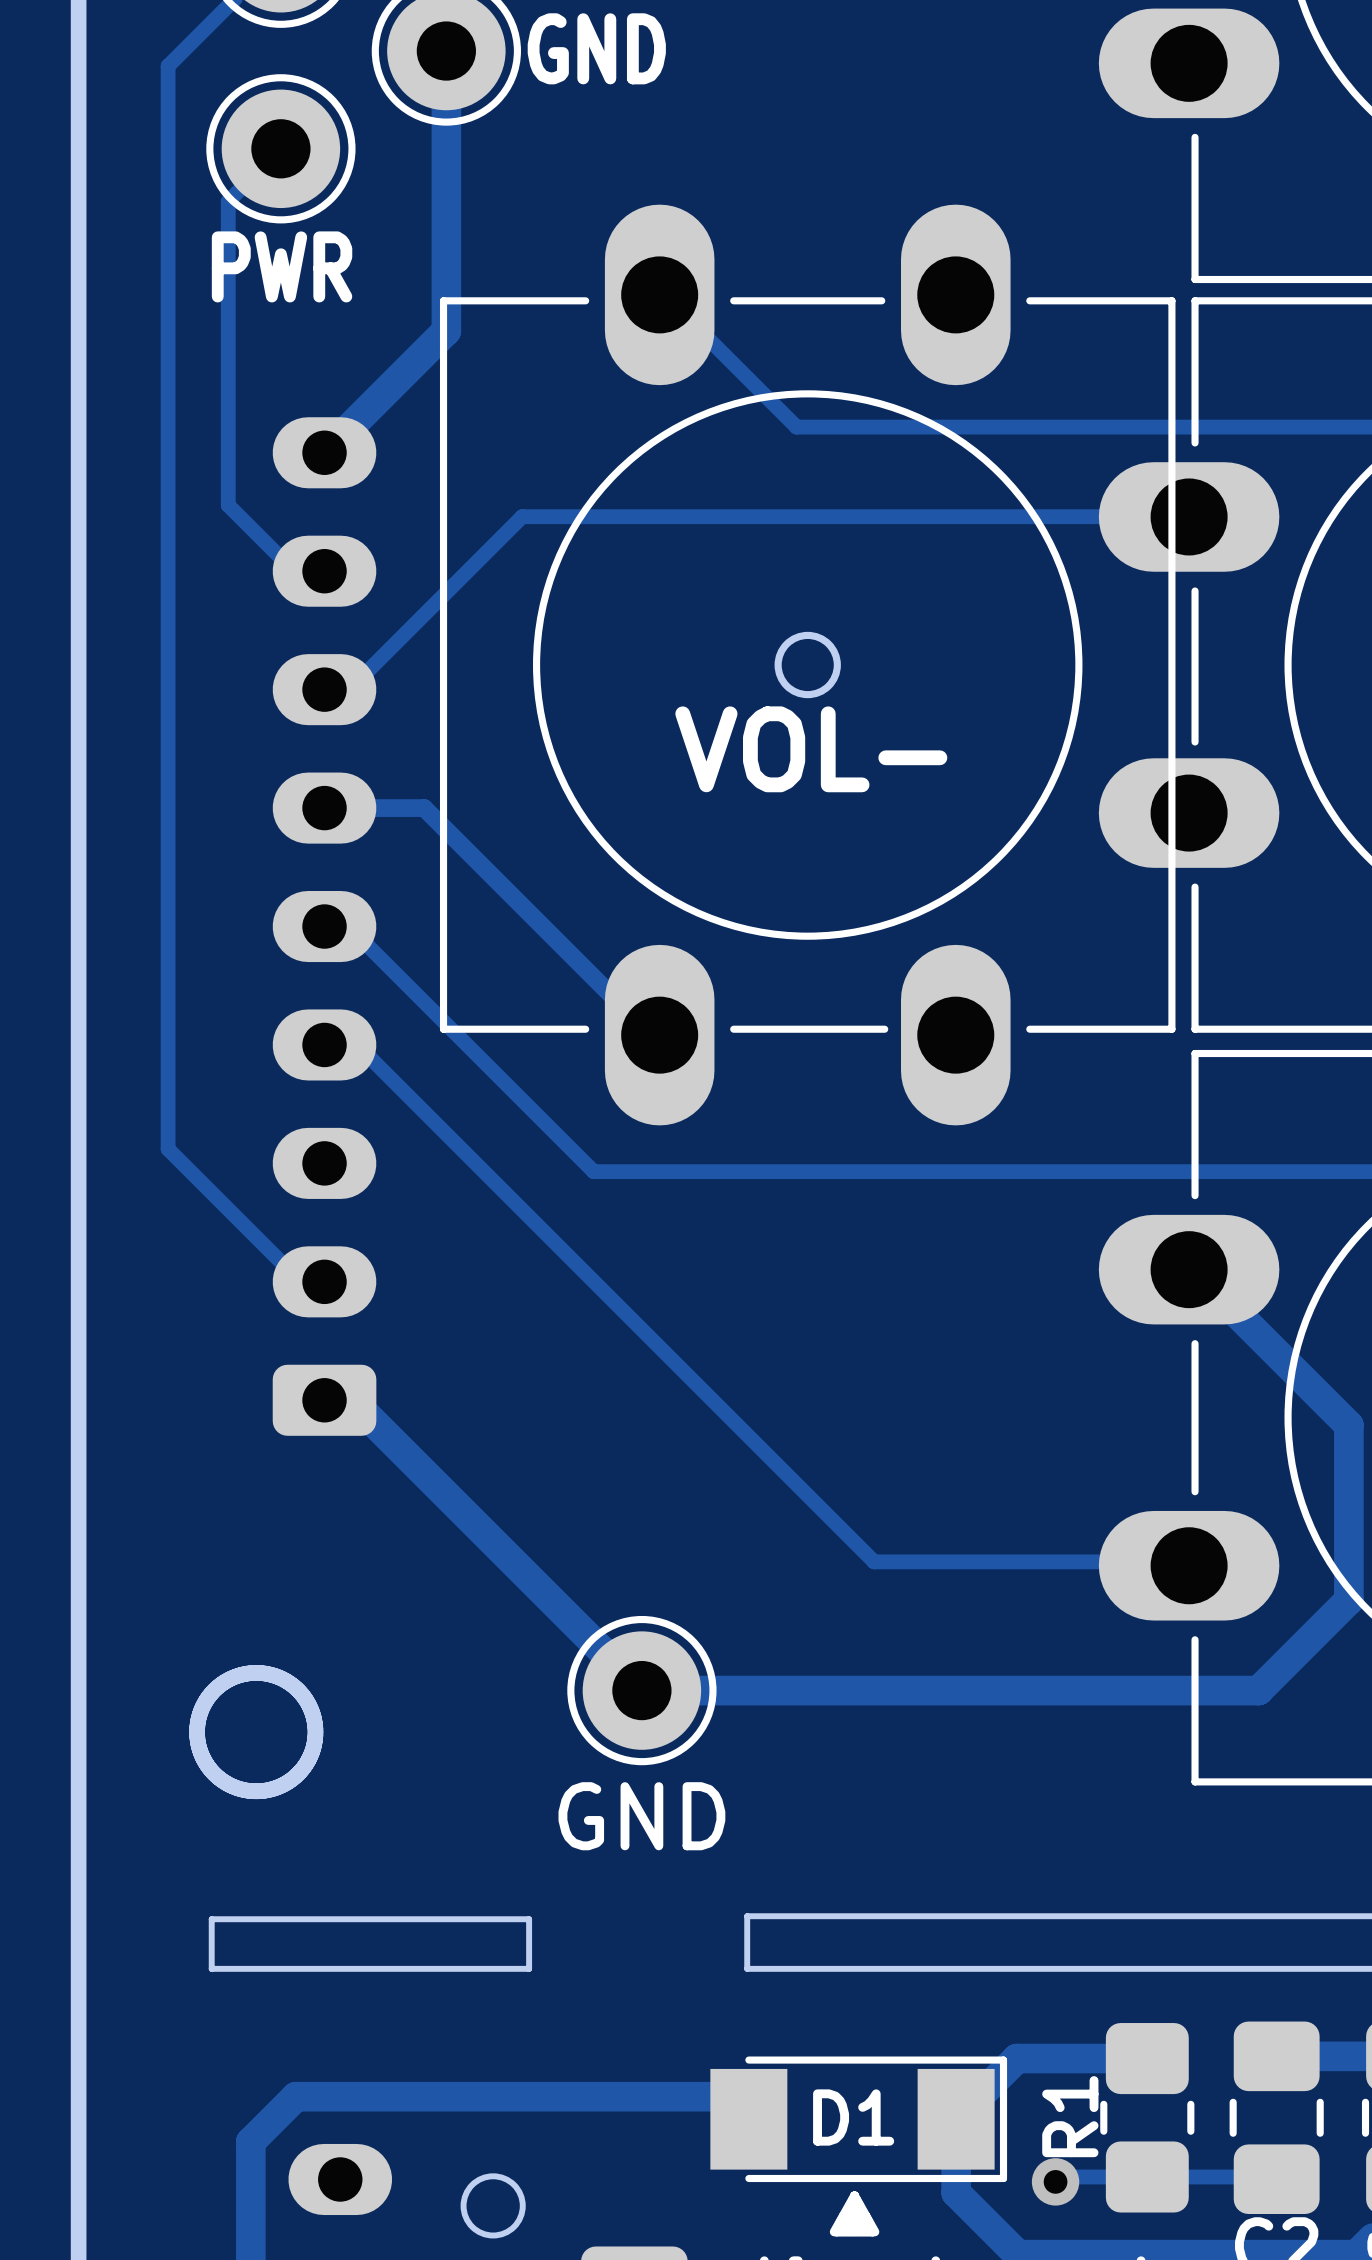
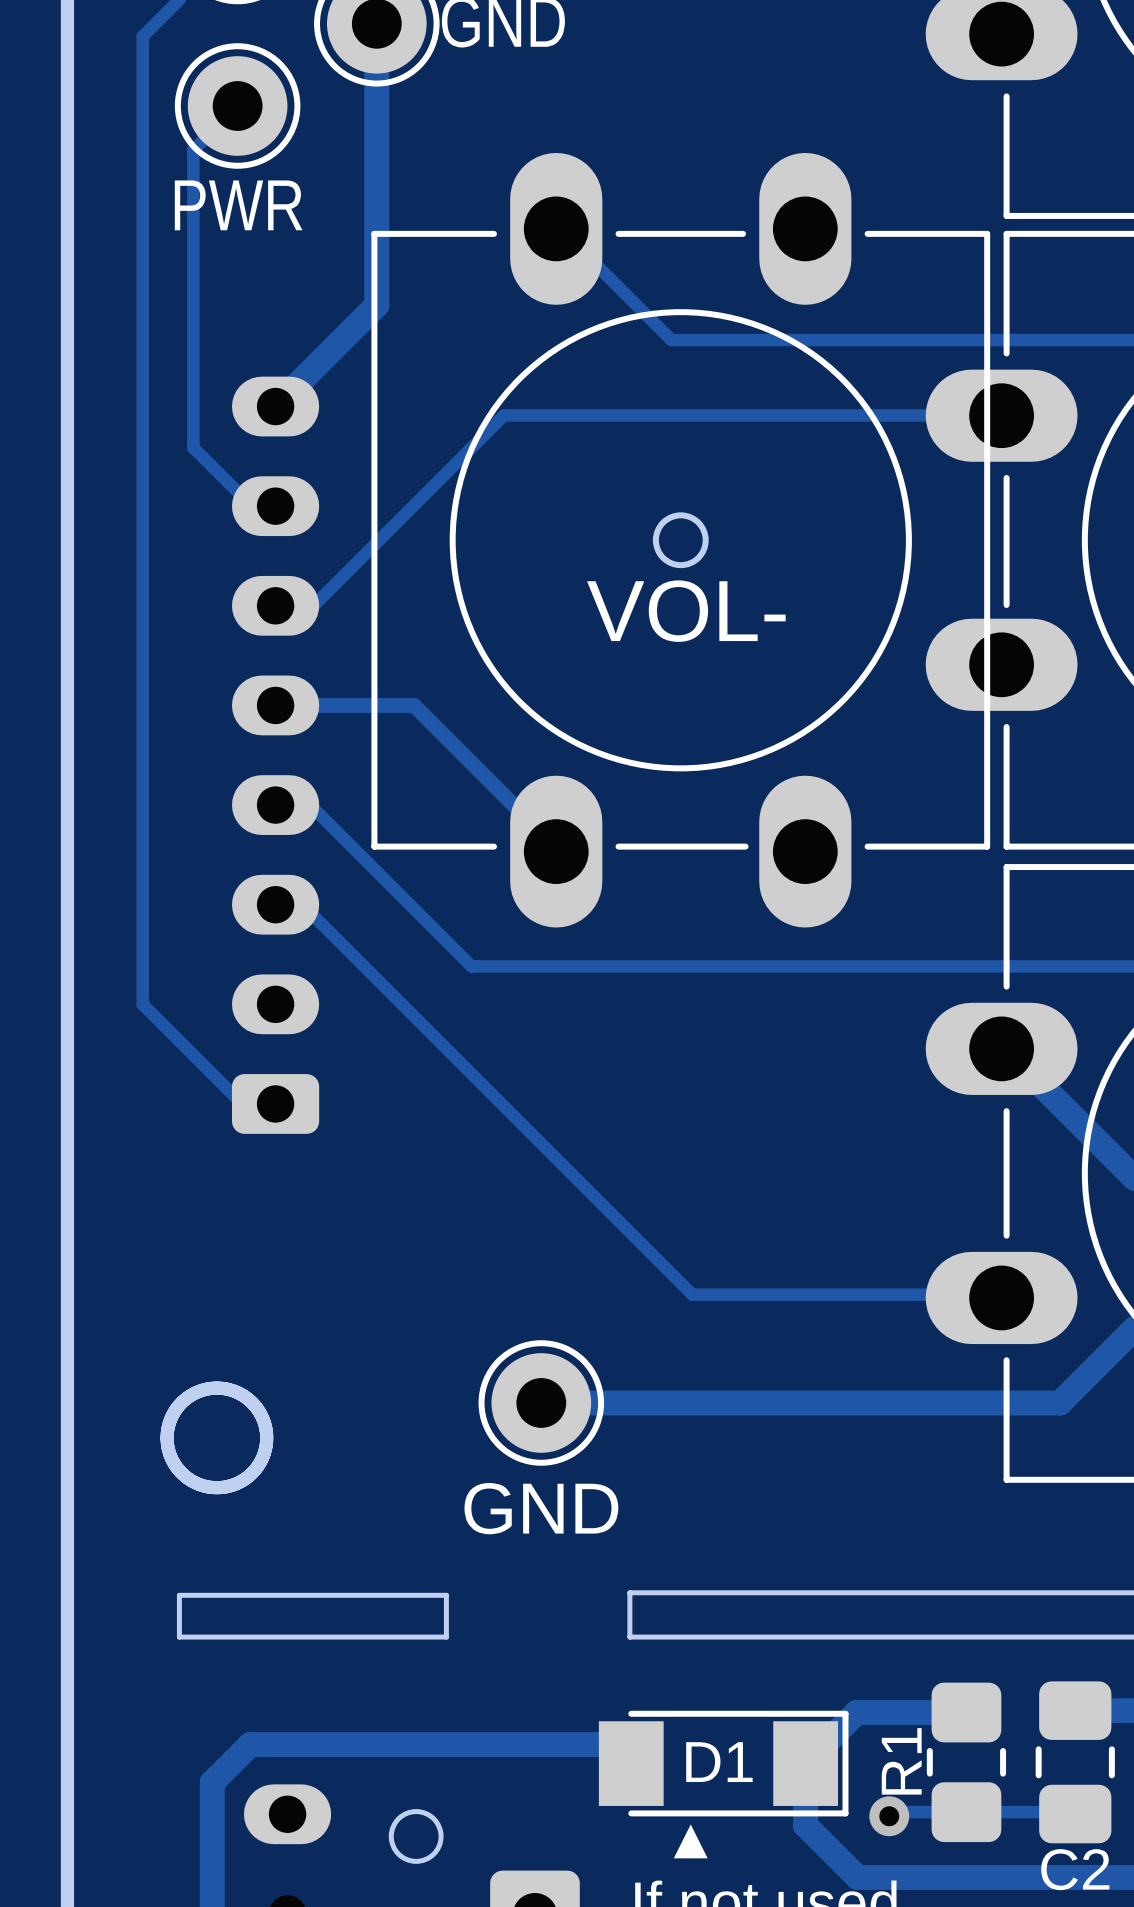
track: (446, 330) (324, 452) -> (376, 259) (376, 305) (275, 406)
part footprint: [272, 417, 377, 1436] -> [231, 376, 320, 1134]
track: (228, 505) (294, 571) (324, 571) -> (193, 405) (193, 447) (247, 501) (275, 501)
track: (597, 516) (522, 516) (349, 689) (324, 689) -> (503, 415) (313, 605) (275, 605)
track: (324, 808) (424, 808) (651, 1035) (659, 1035) -> (275, 705) (414, 705) (556, 847) (556, 851)
track: (324, 926) (348, 926) (593, 1171) -> (275, 805) (310, 805) (471, 966) (500, 966)
track: (324, 1044) (357, 1044) (874, 1561) -> (275, 904) (302, 904) (692, 1294) (736, 1294)
track: (168, 1149) (300, 1281) (324, 1281) -> (142, 947) (142, 1004) (242, 1103) (275, 1103)
track: (324, 1400) (351, 1400) (641, 1690) -> none

